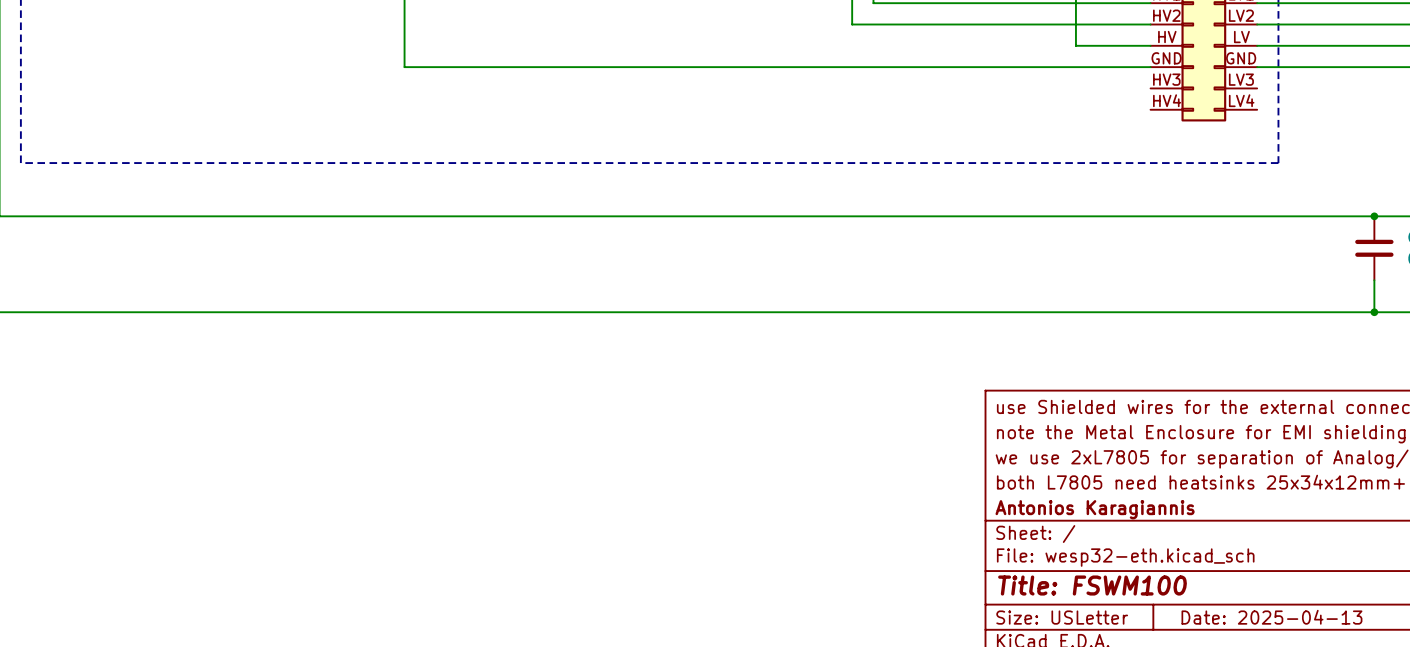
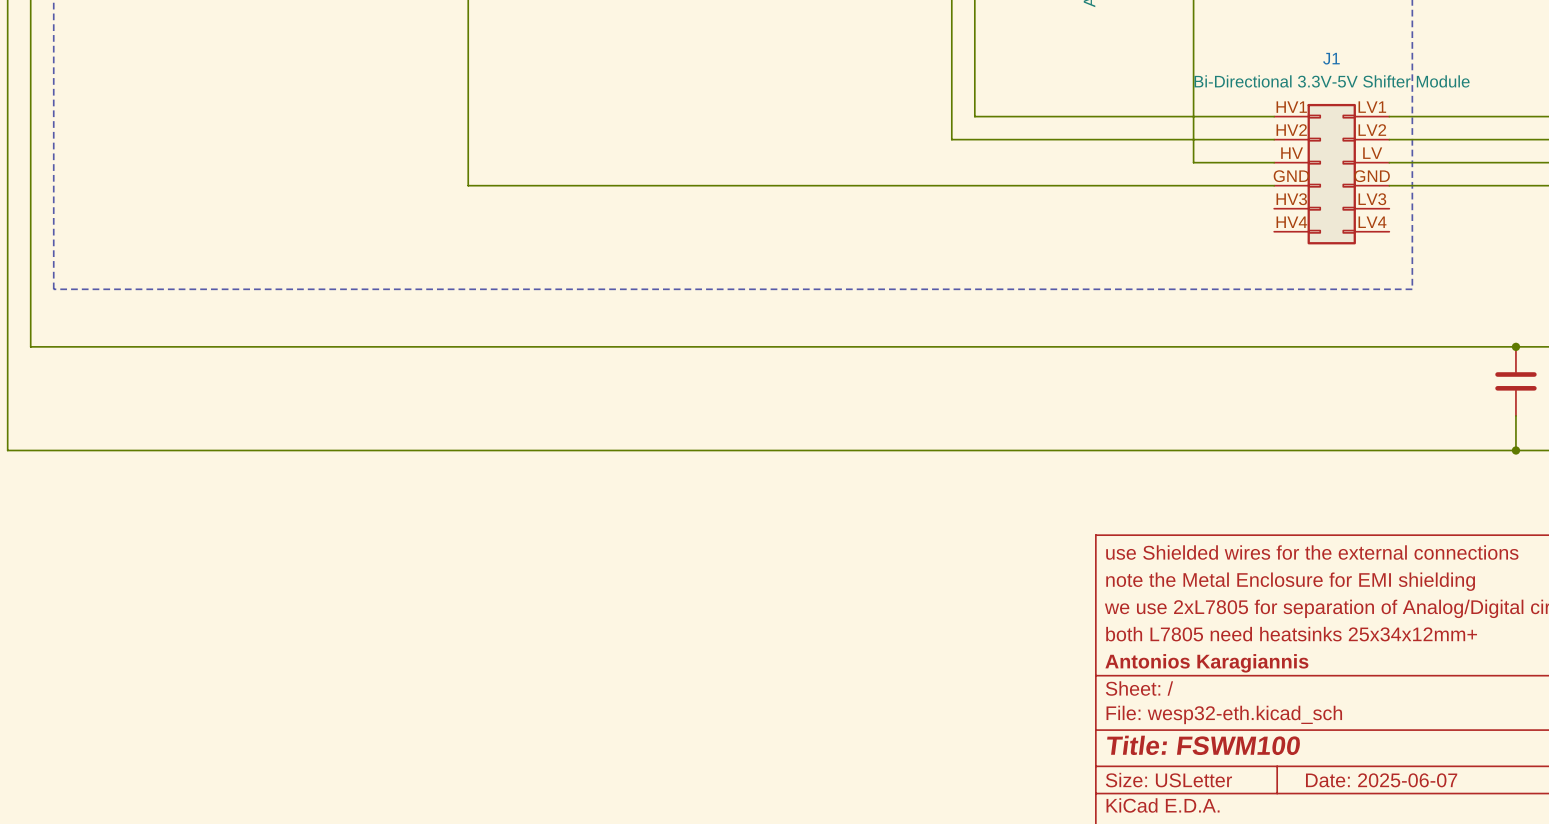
title block: Date: 2025-04-13 (1271, 617) -> Date: 2025-06-07 (1381, 780)

